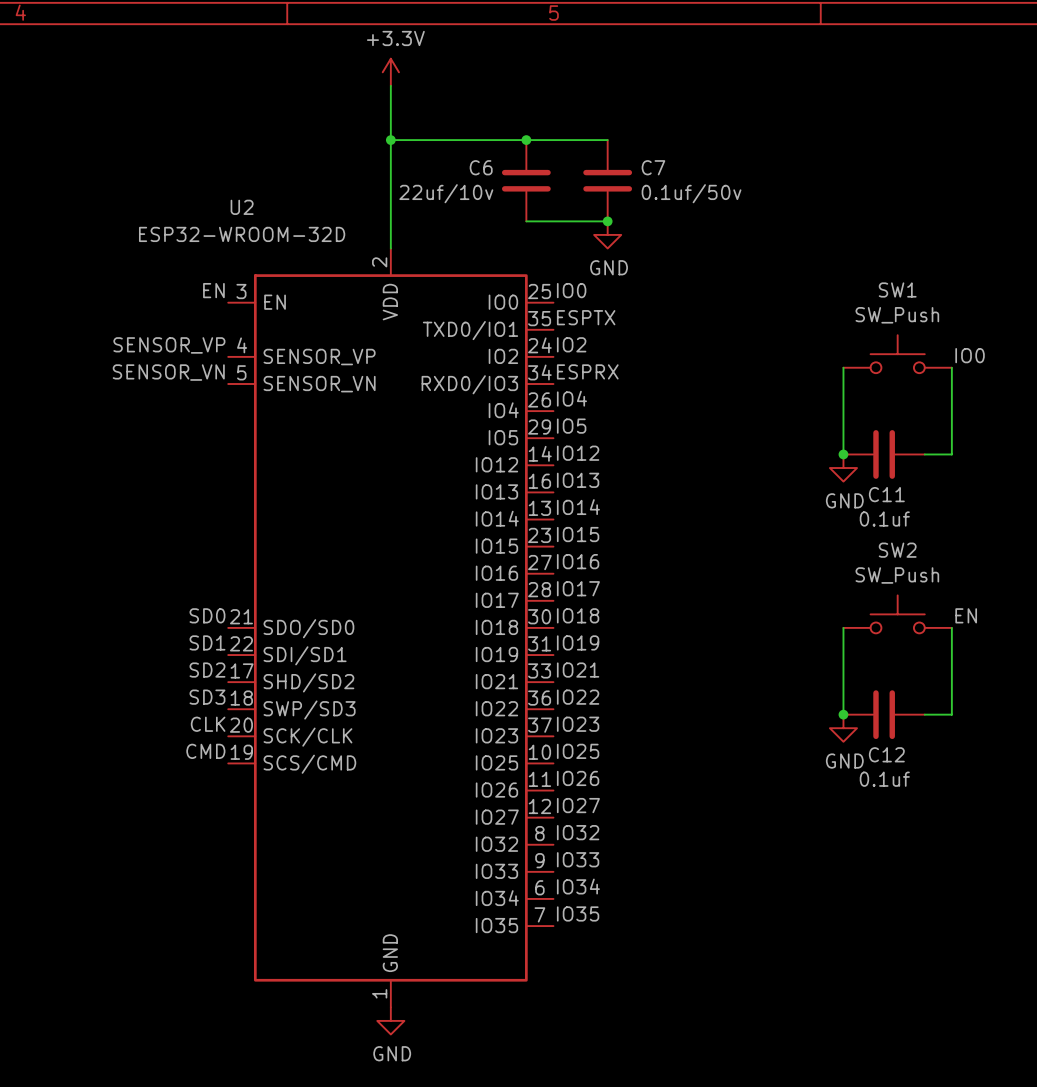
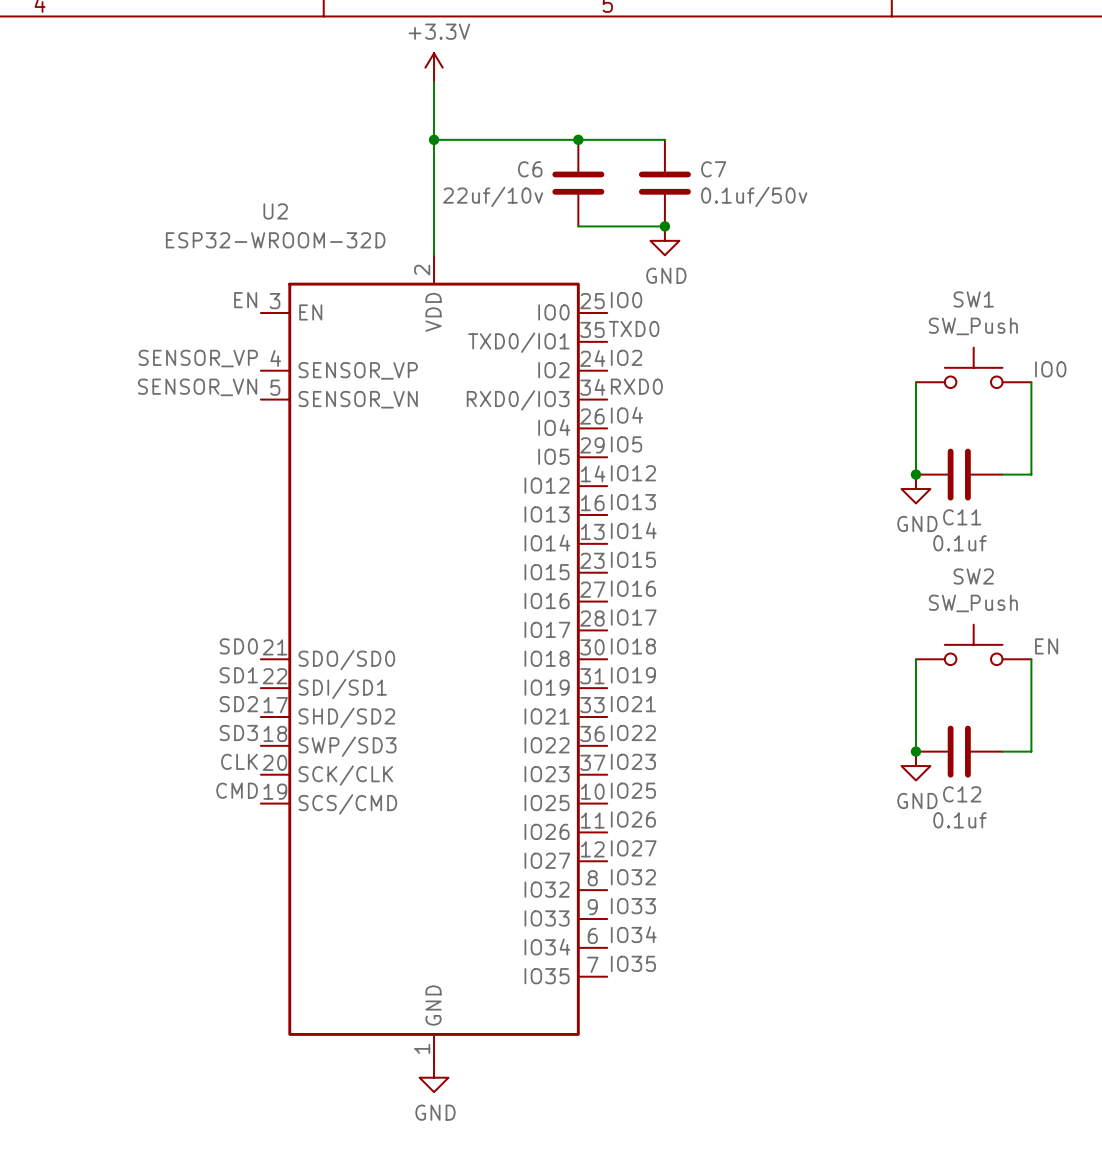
label: ESPTX (586, 317) -> TXD0 (634, 328)
label: ESPRX (587, 371) -> RXD0 (636, 386)

